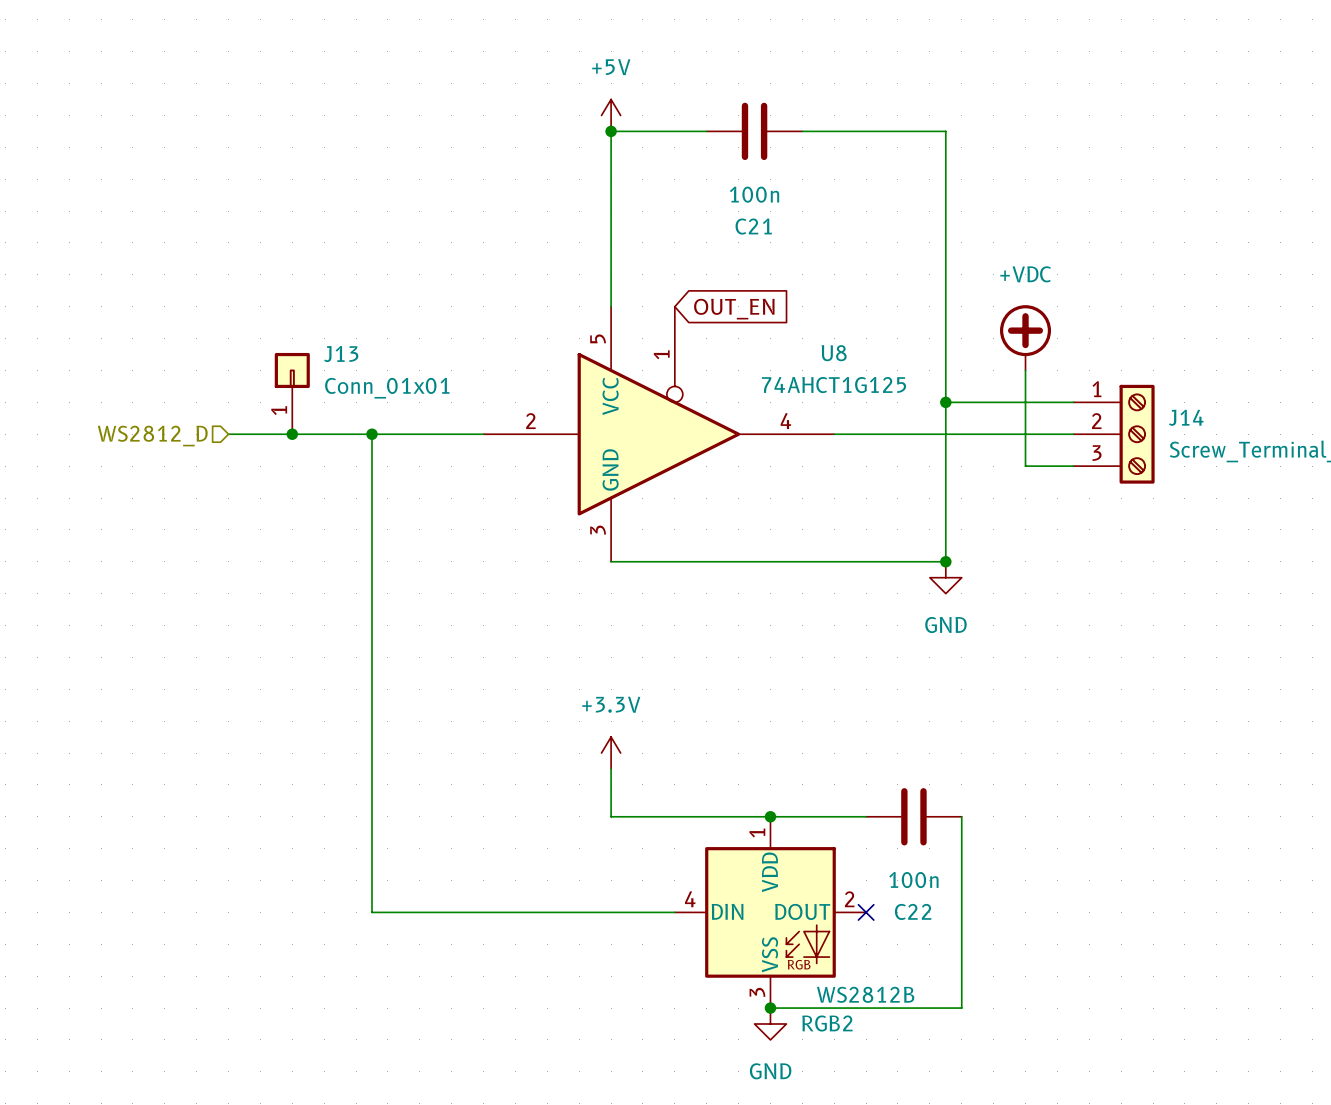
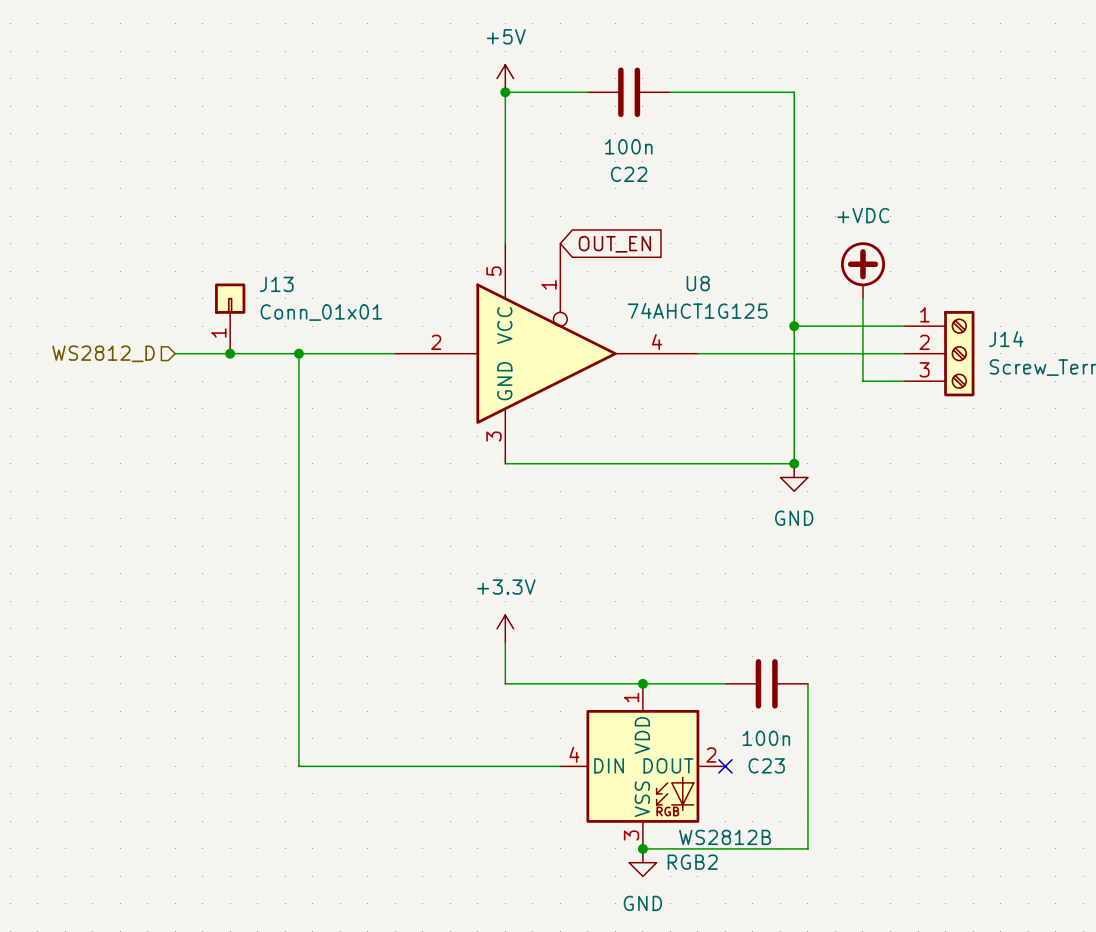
C21 name: C21 (753, 226) -> C22 (629, 174)
C22 name: C22 (913, 911) -> C23 (766, 765)

